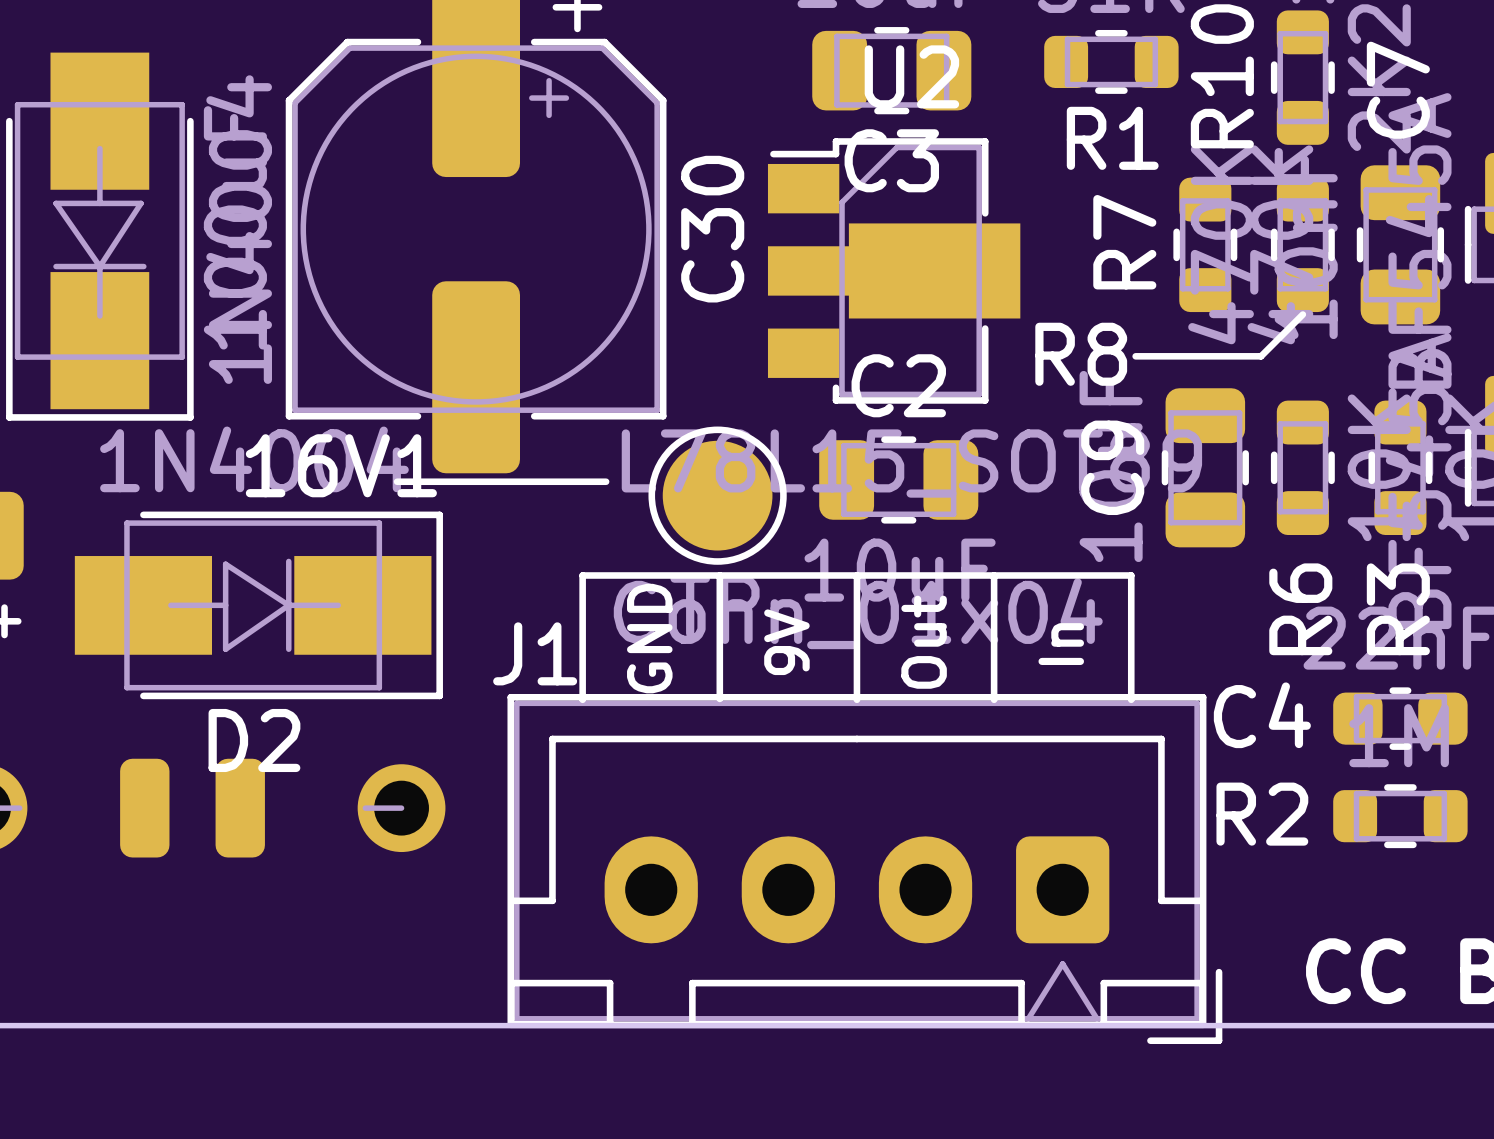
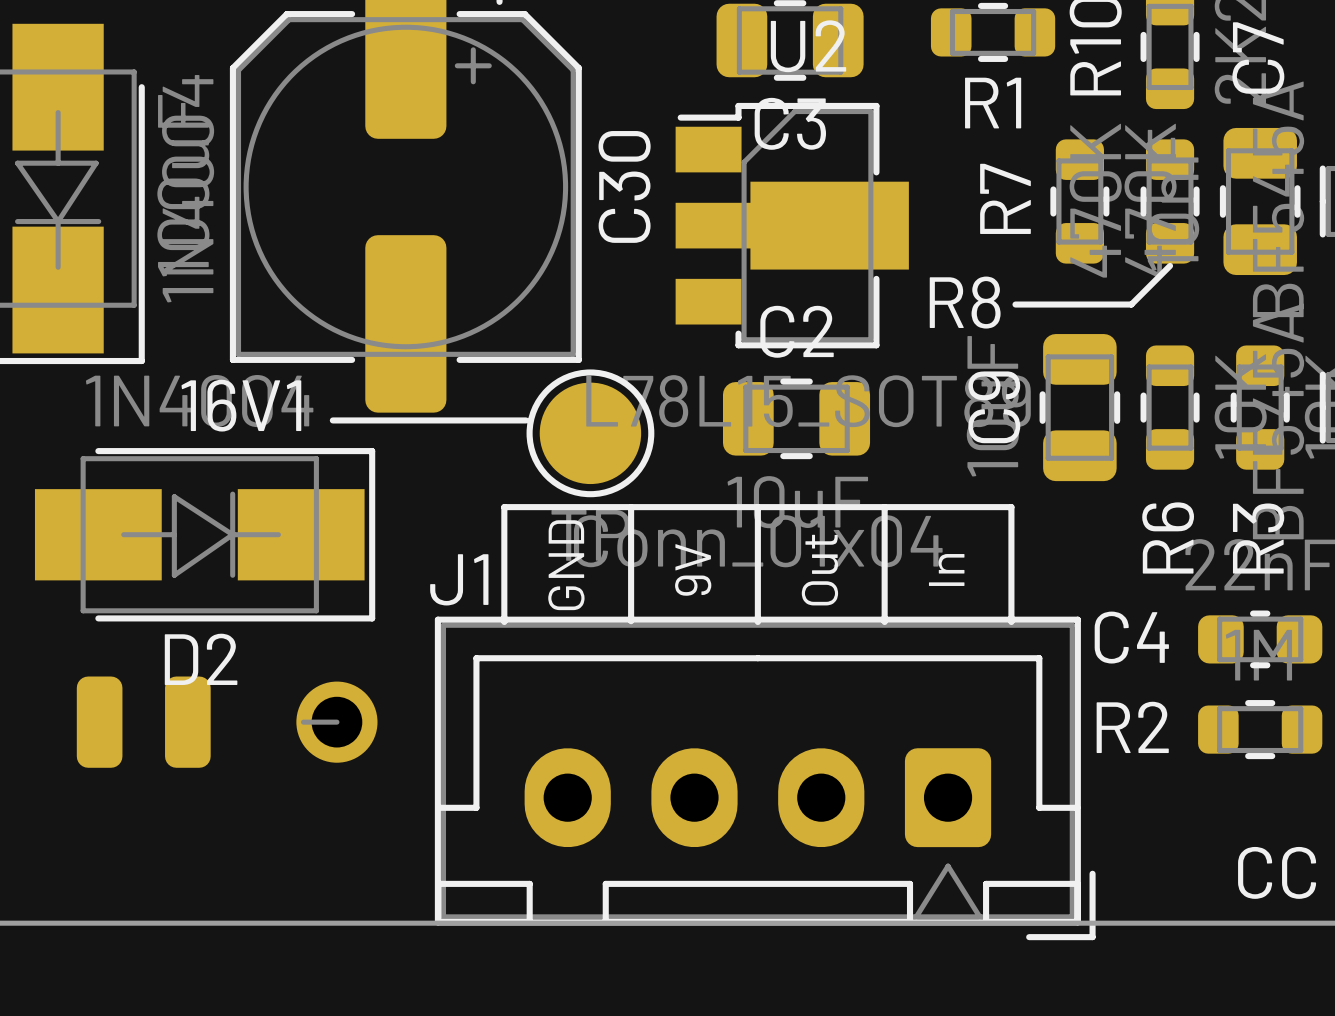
16V1 position: (717, 495) -> (590, 433)

